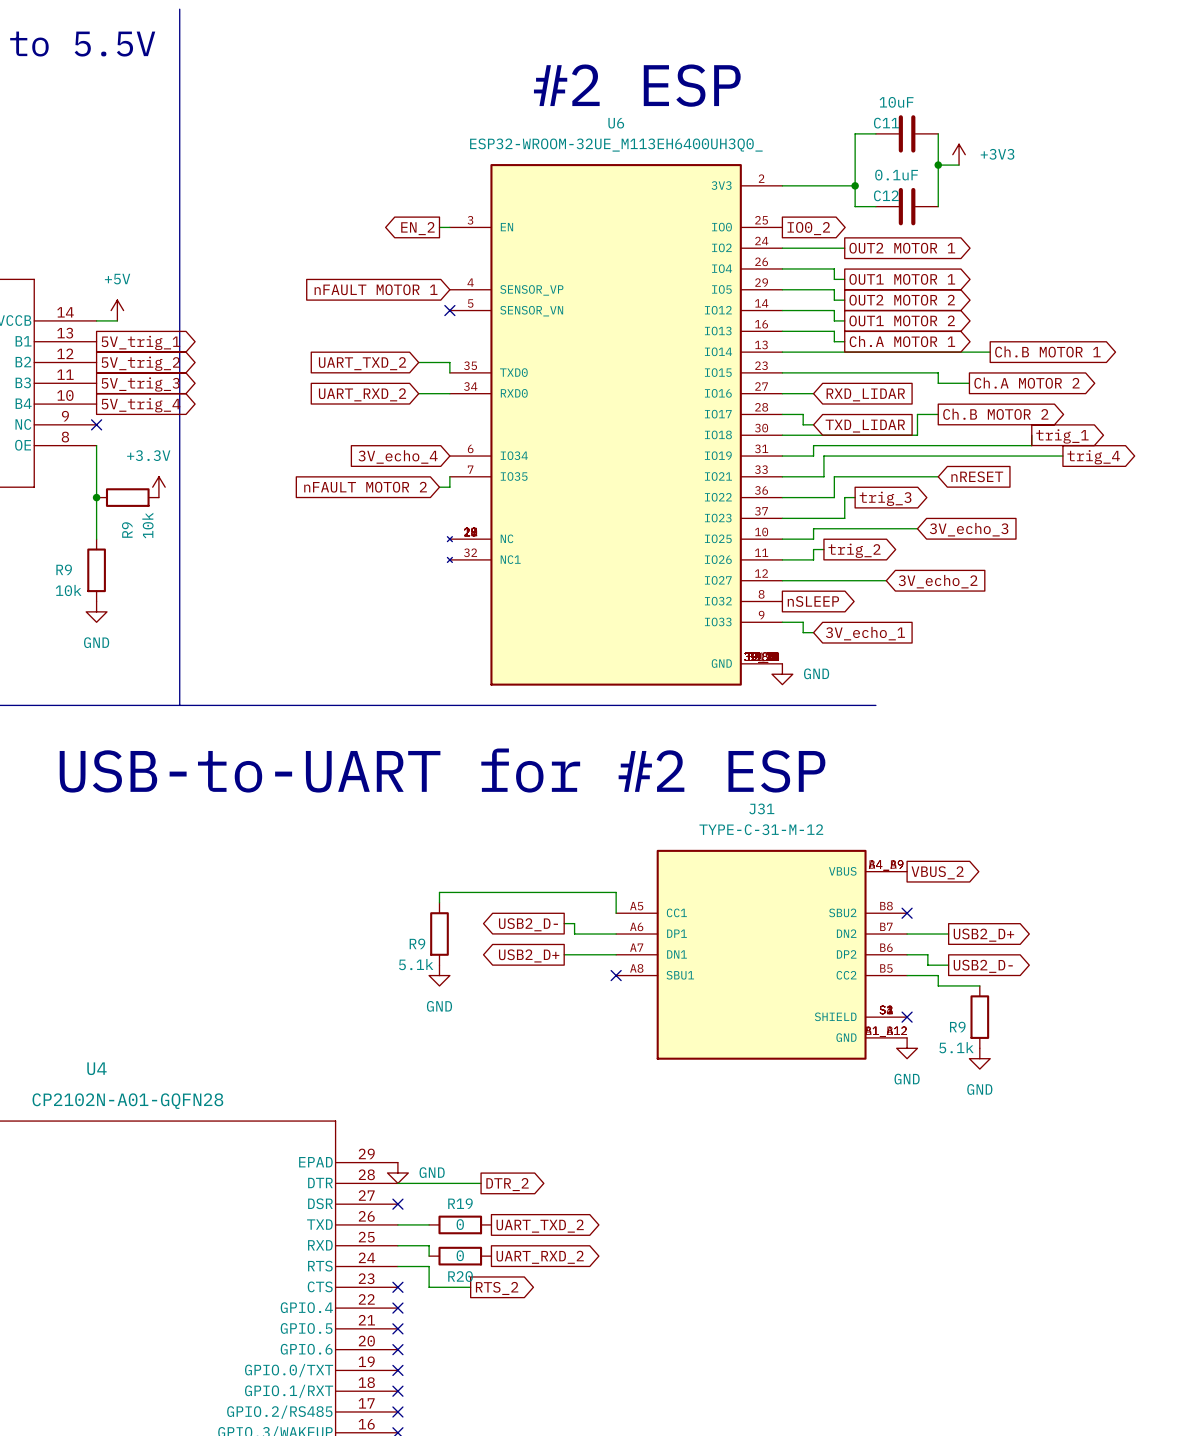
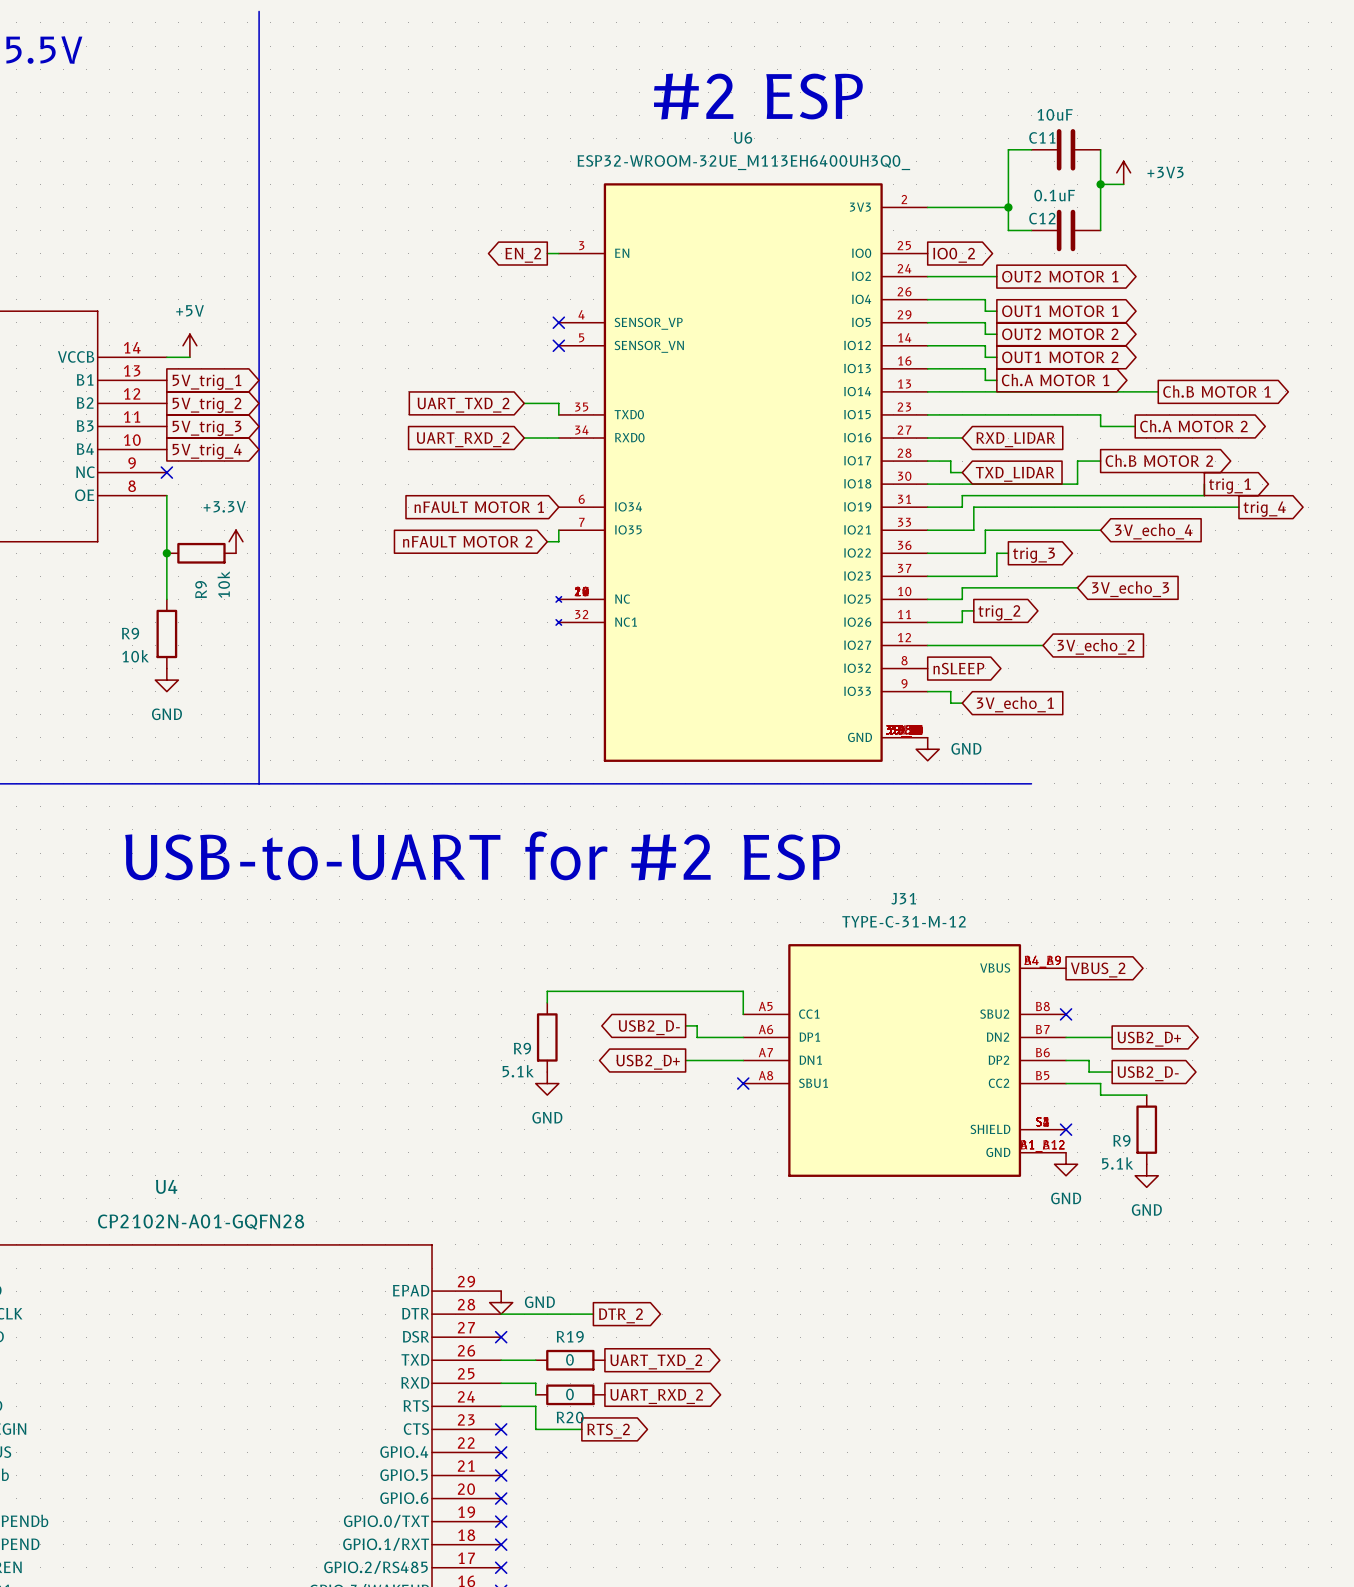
global label: nFAULT MOTOR 1 (376, 289) -> none
no-connect mark: none -> (558, 322)
global label: 3V_echo_4 (398, 456) -> nFAULT MOTOR 1 (479, 507)
global label: nRESET (977, 476) -> 3V_echo_4 (1153, 531)

